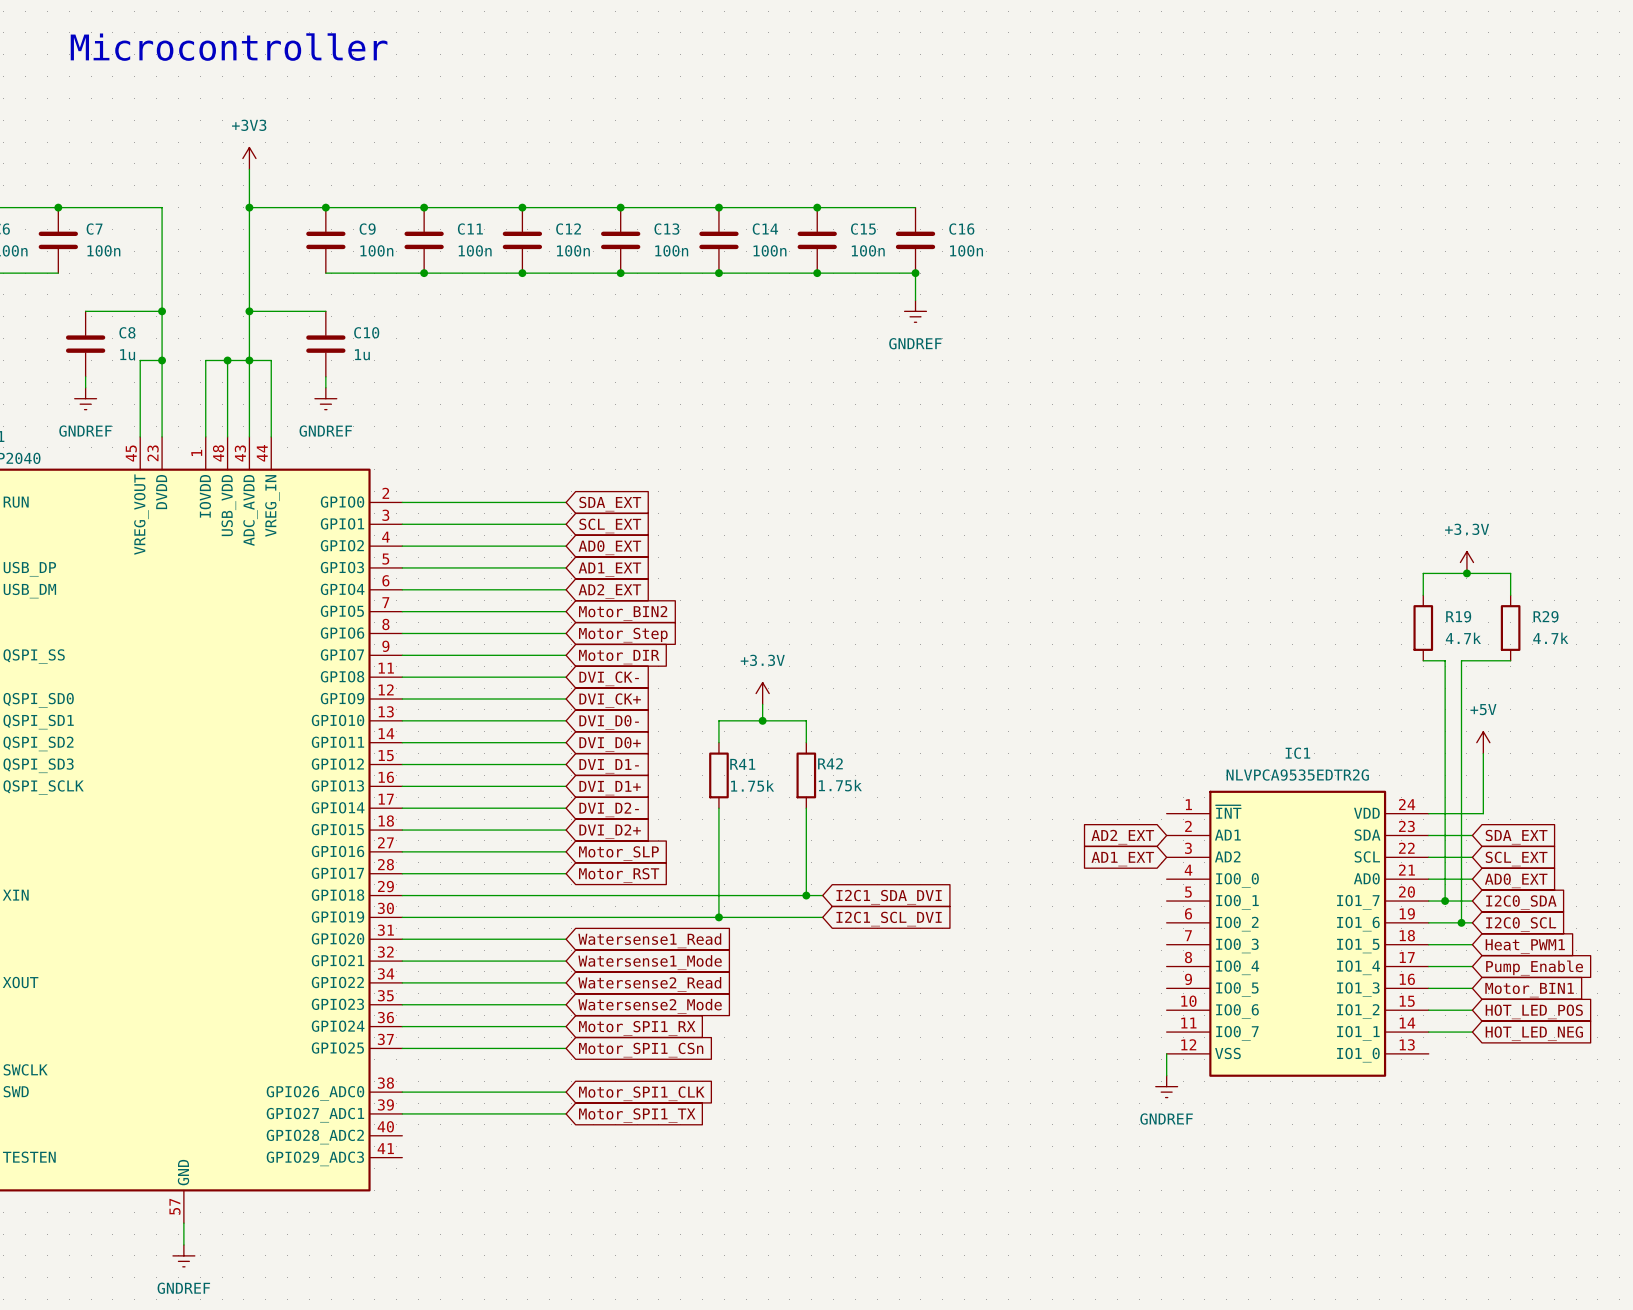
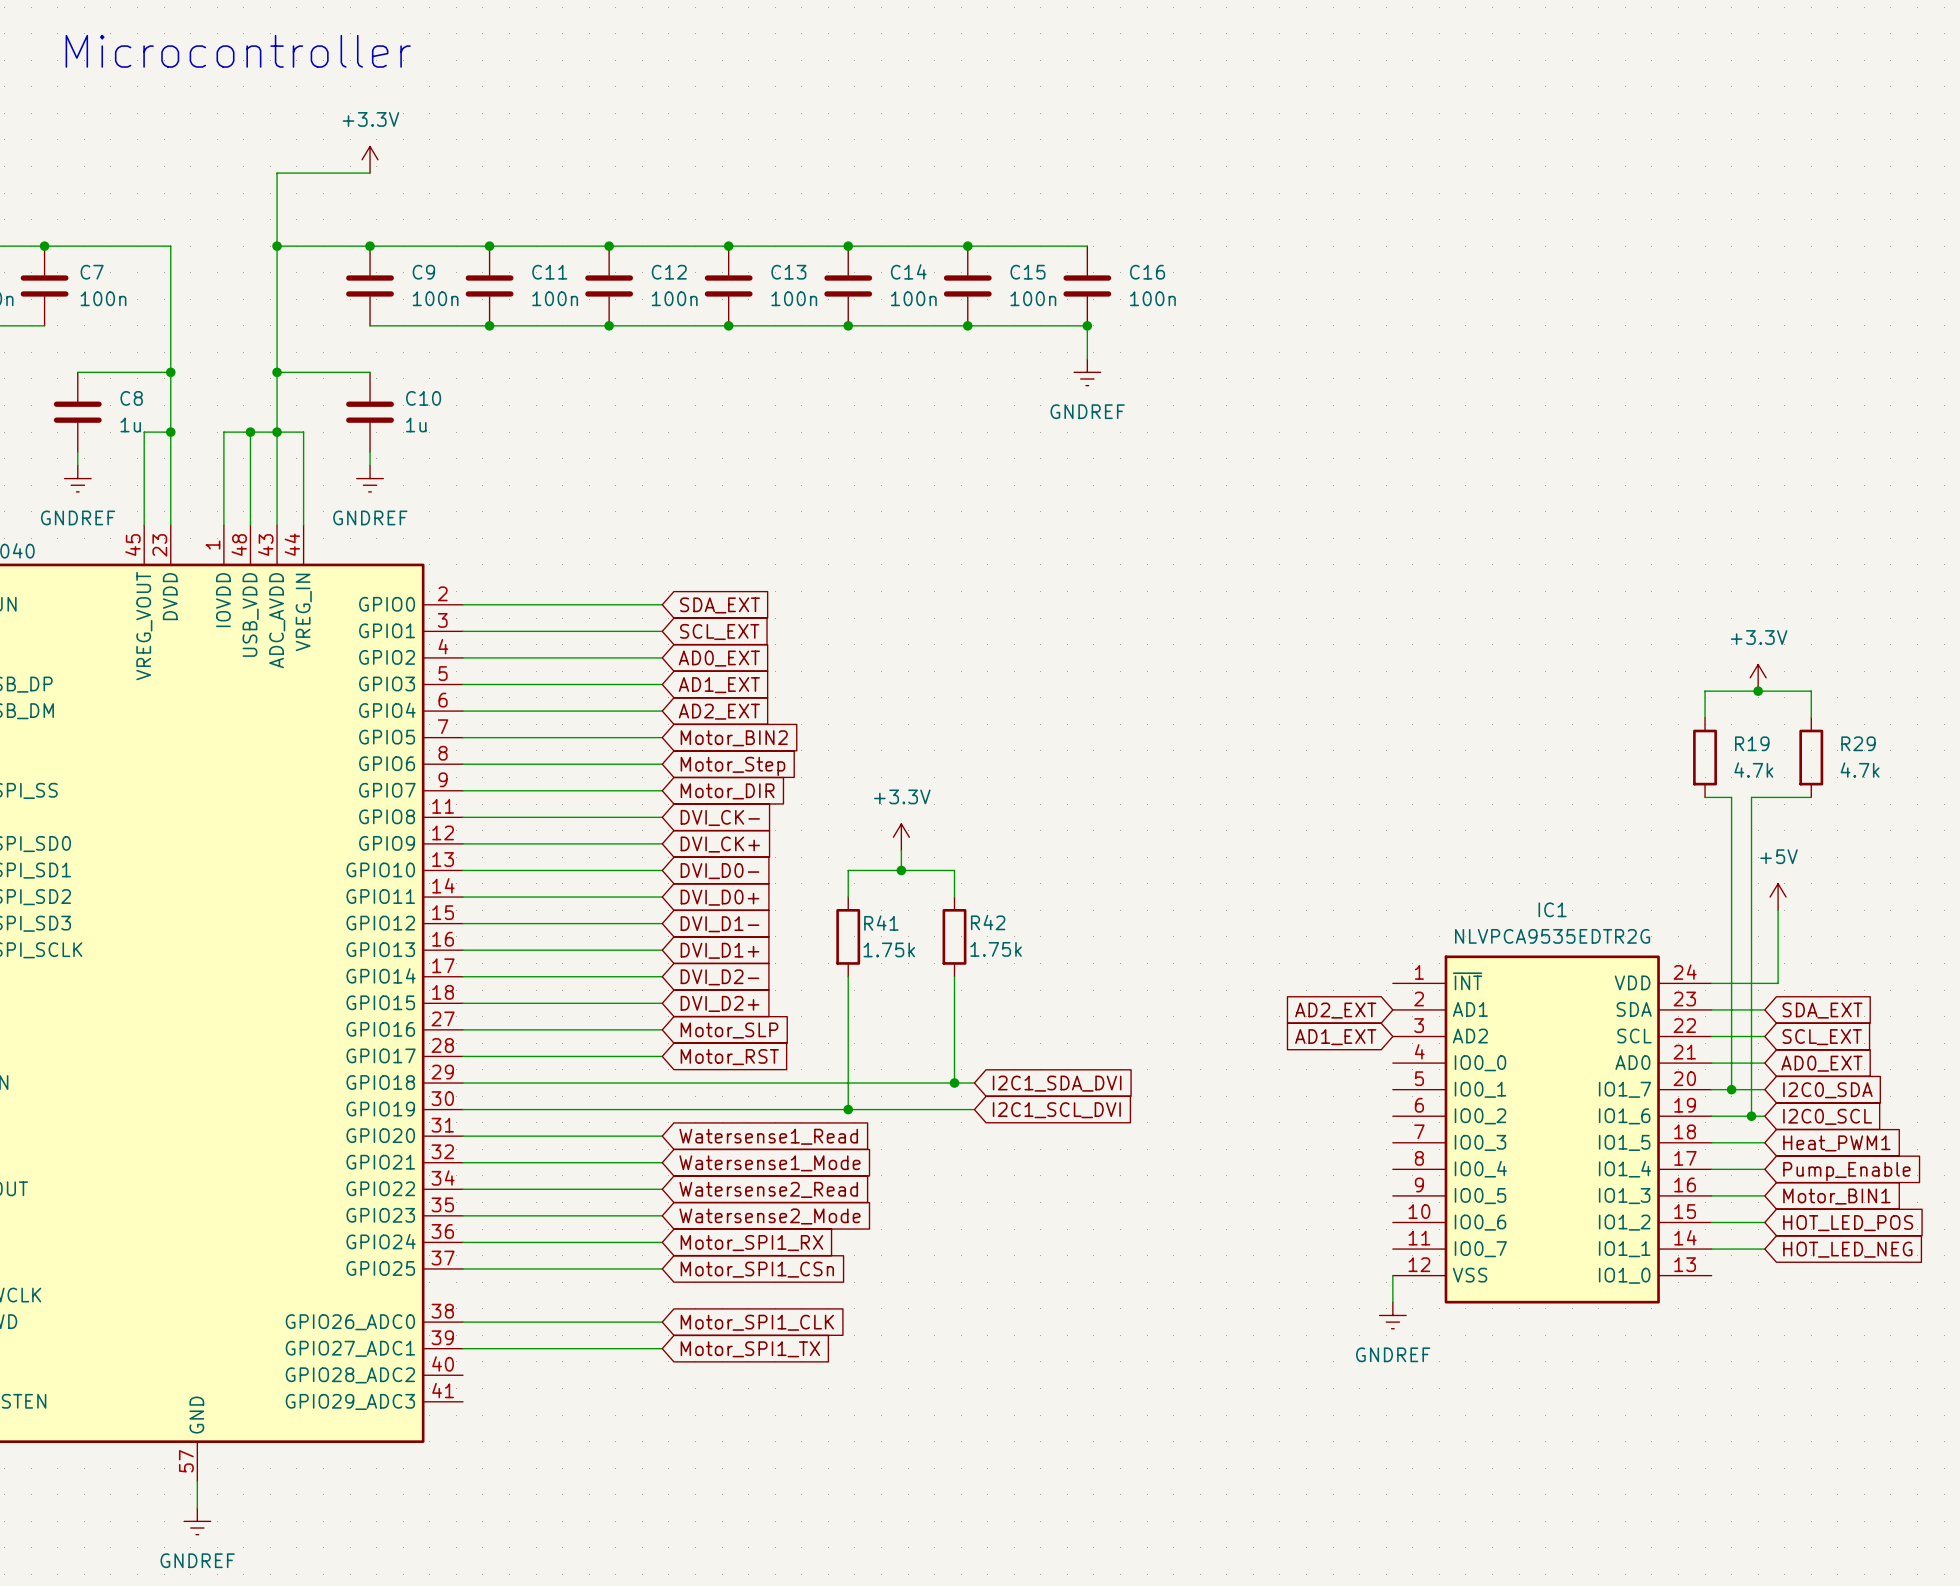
power symbol: none -> +3.3V (370, 159)
wire: none -> (370, 173) (277, 173) (277, 199)
power symbol: +3V3 (249, 158) -> none

